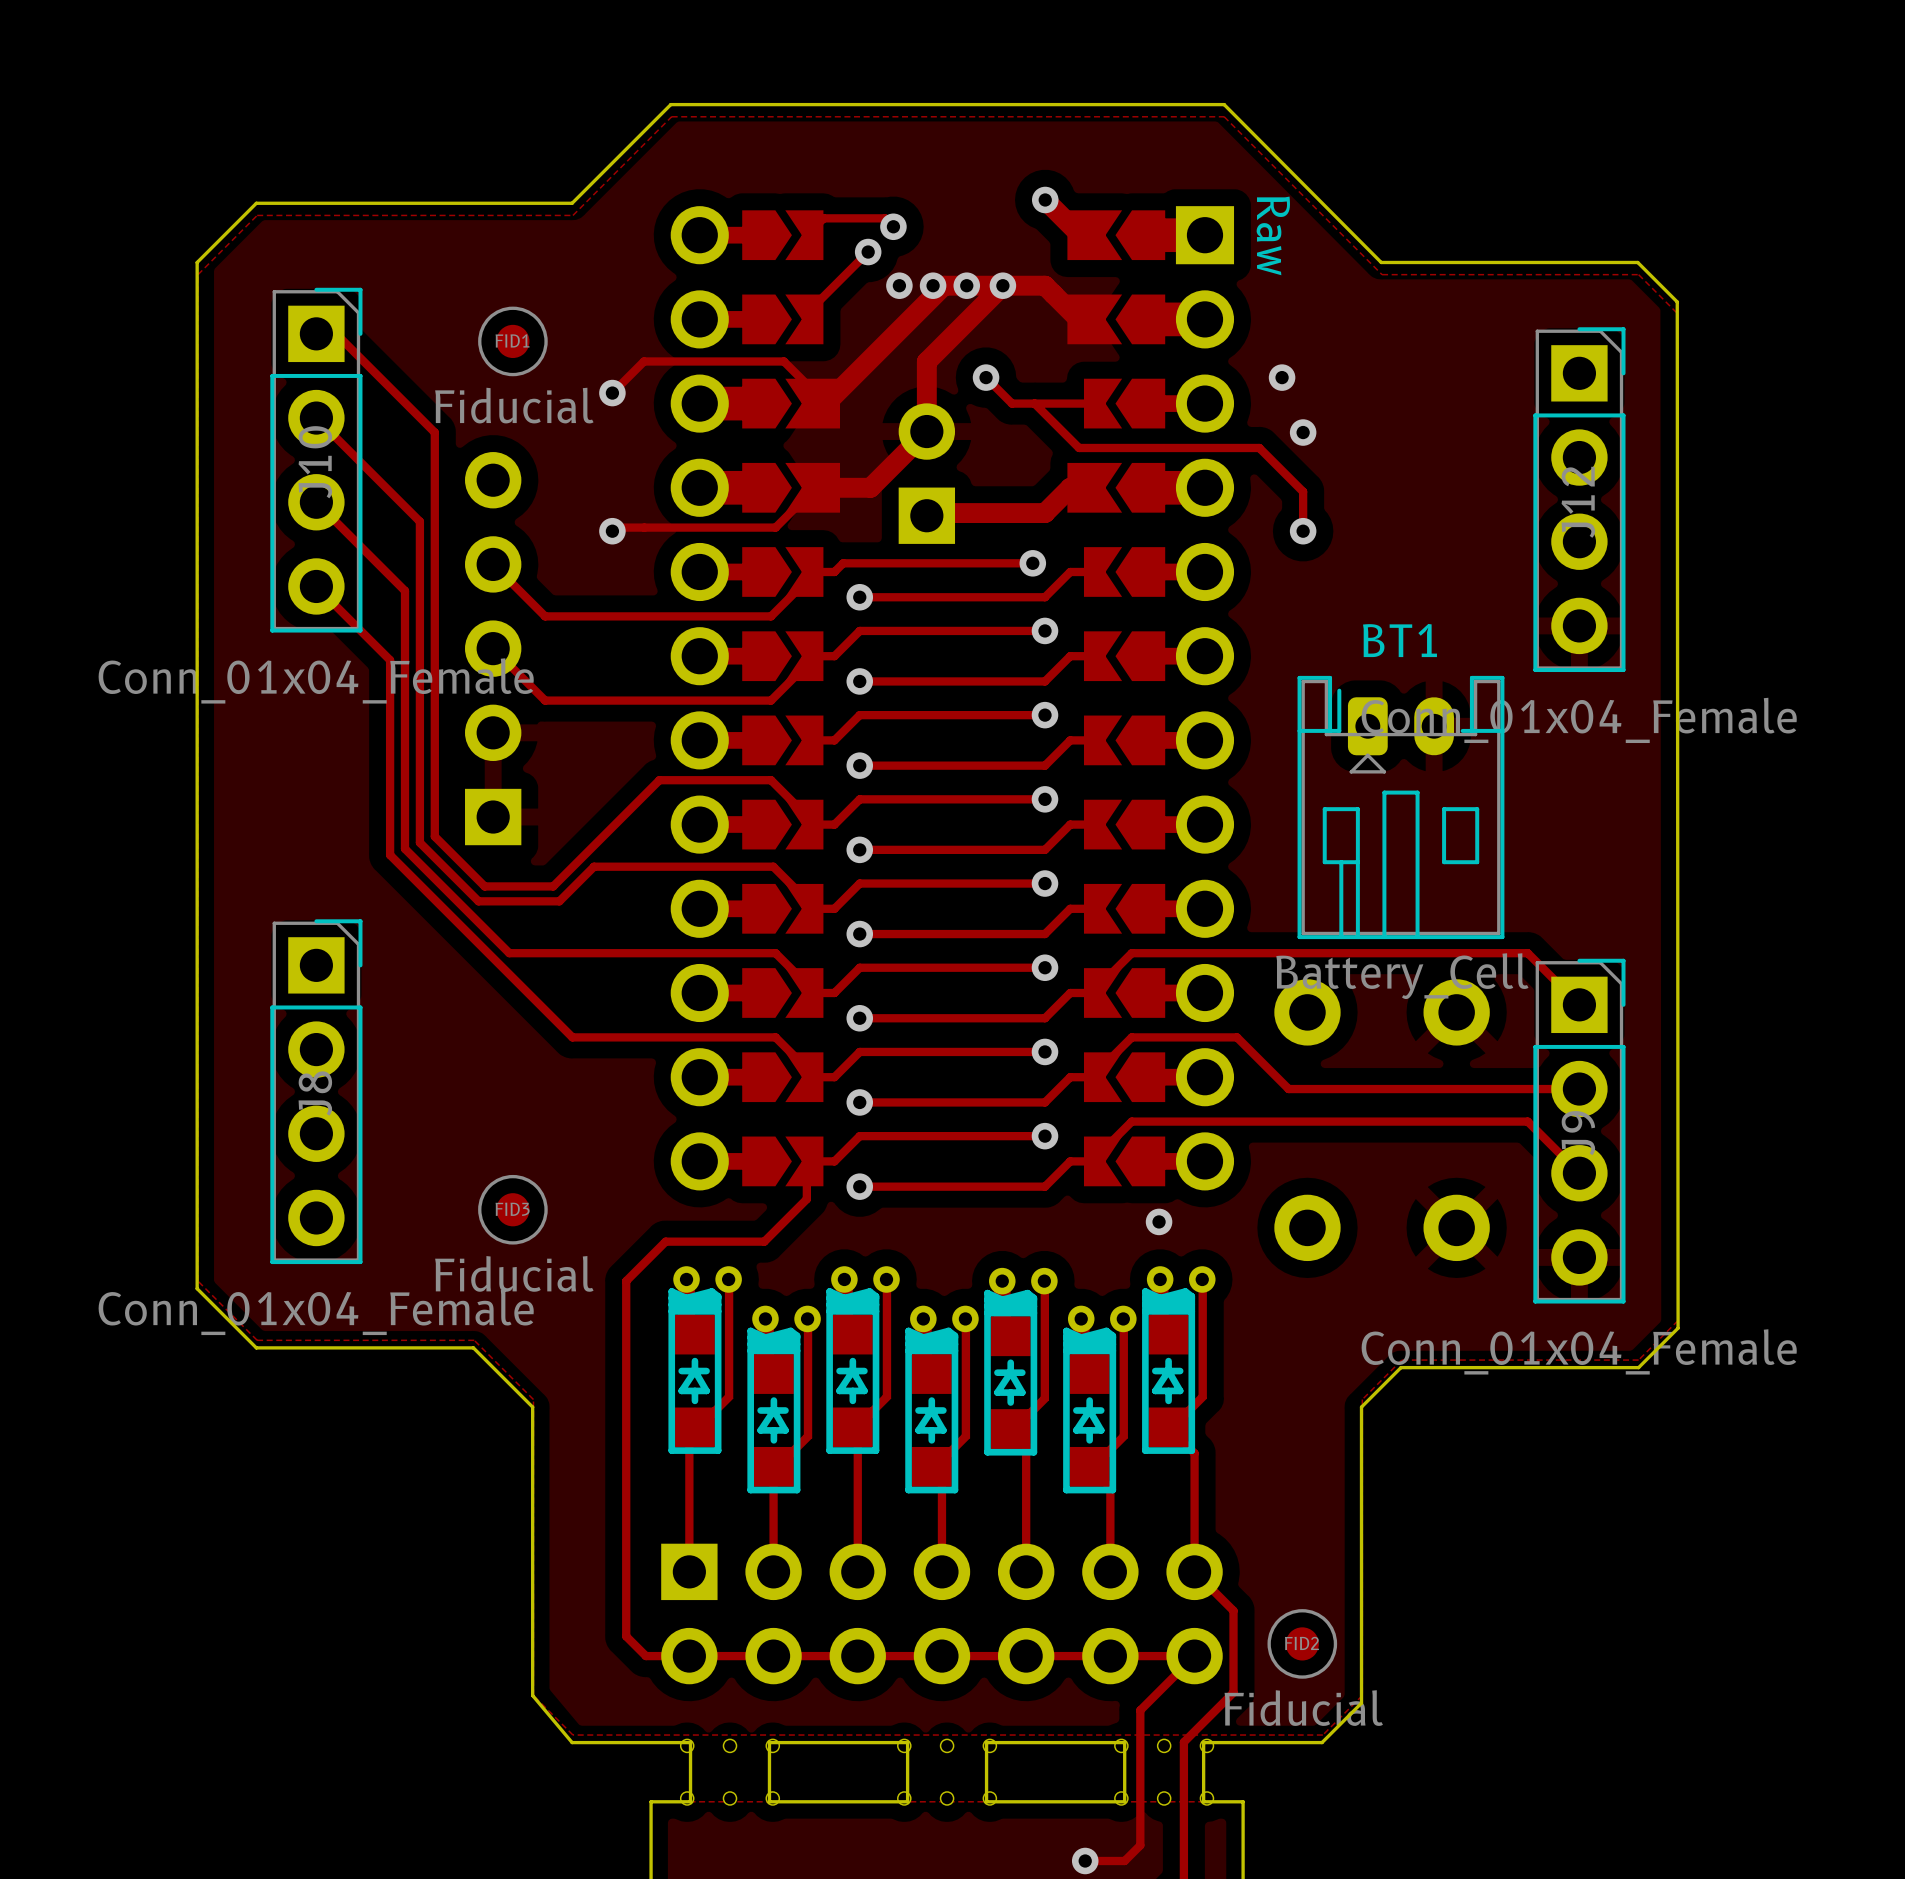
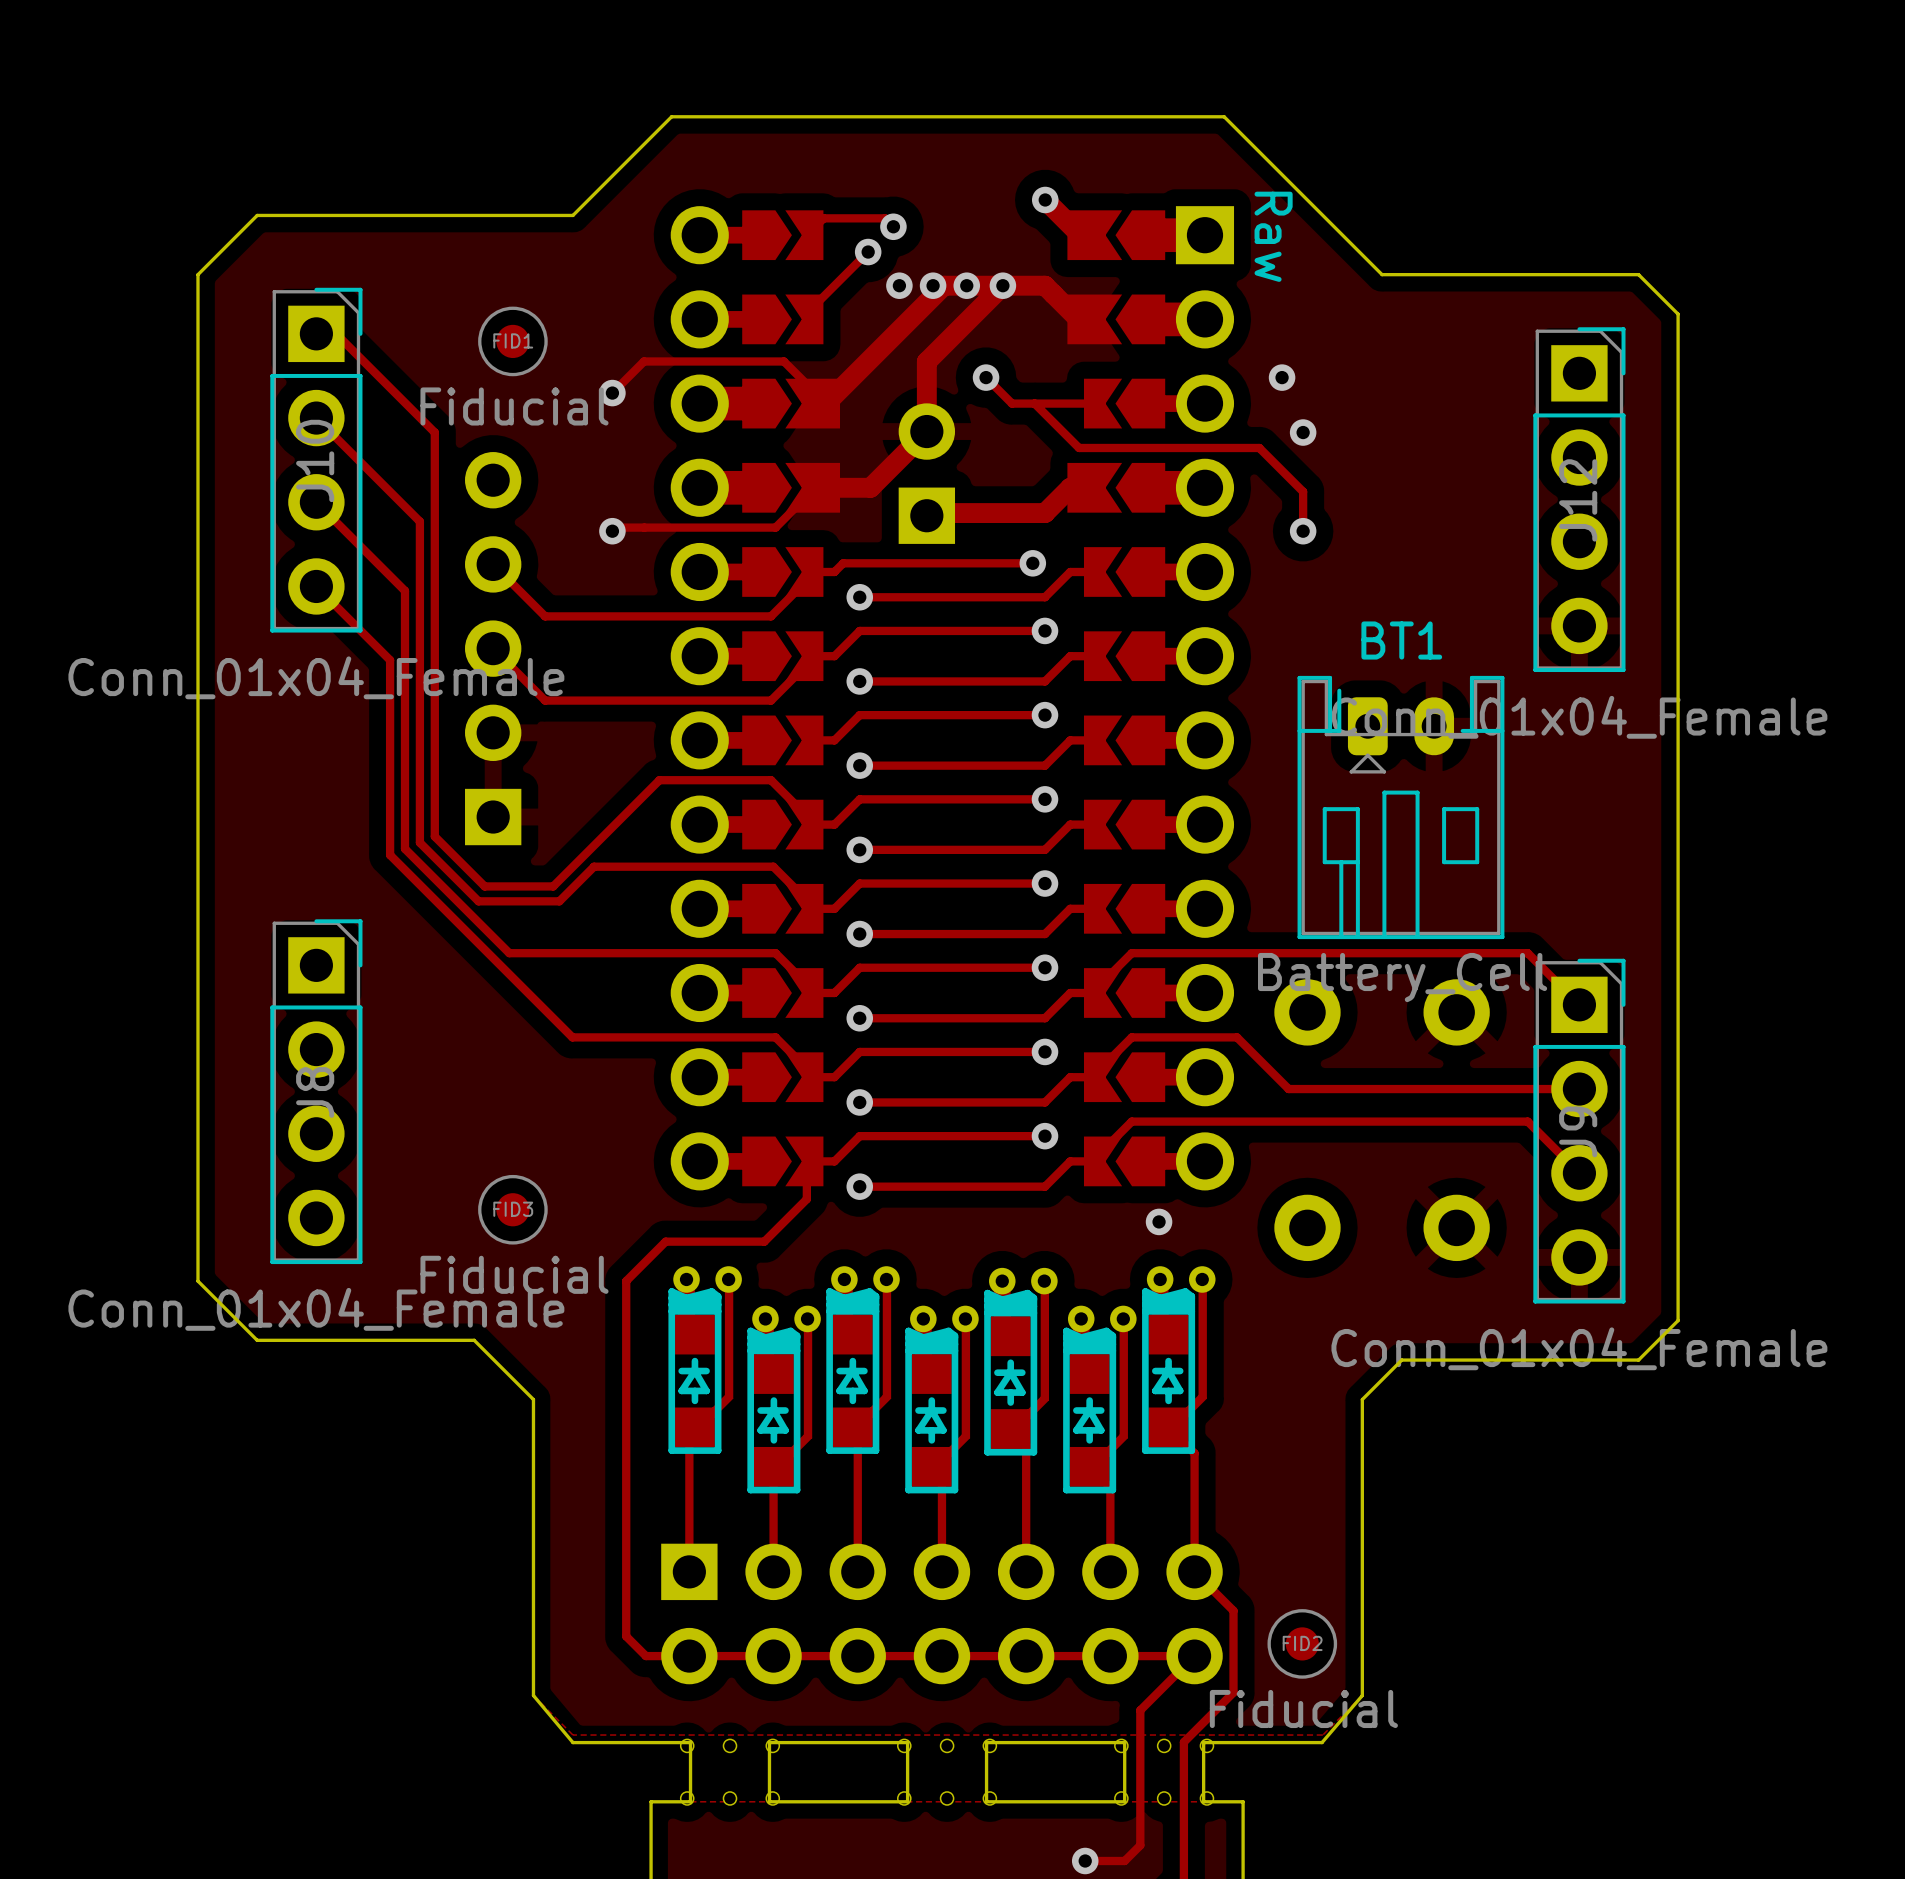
board edge: (572, 1742) (532, 1695) (532, 1407) (473, 1347) (256, 1347) (197, 1288) (197, 262) (256, 203) (572, 203) (670, 104) (1224, 104) (1381, 262) (1637, 262) (1677, 301) (1678, 1328) (1638, 1367) (1400, 1367) (1361, 1407) (1361, 1703) (1322, 1742) -> (572, 1742) (533, 1695) (533, 1399) (474, 1340) (257, 1340) (197, 1281) (197, 274) (257, 215) (572, 215) (671, 116) (1224, 116) (1382, 274) (1638, 274) (1678, 314) (1678, 1320) (1638, 1360) (1401, 1360) (1362, 1399) (1362, 1695) (1322, 1742)

